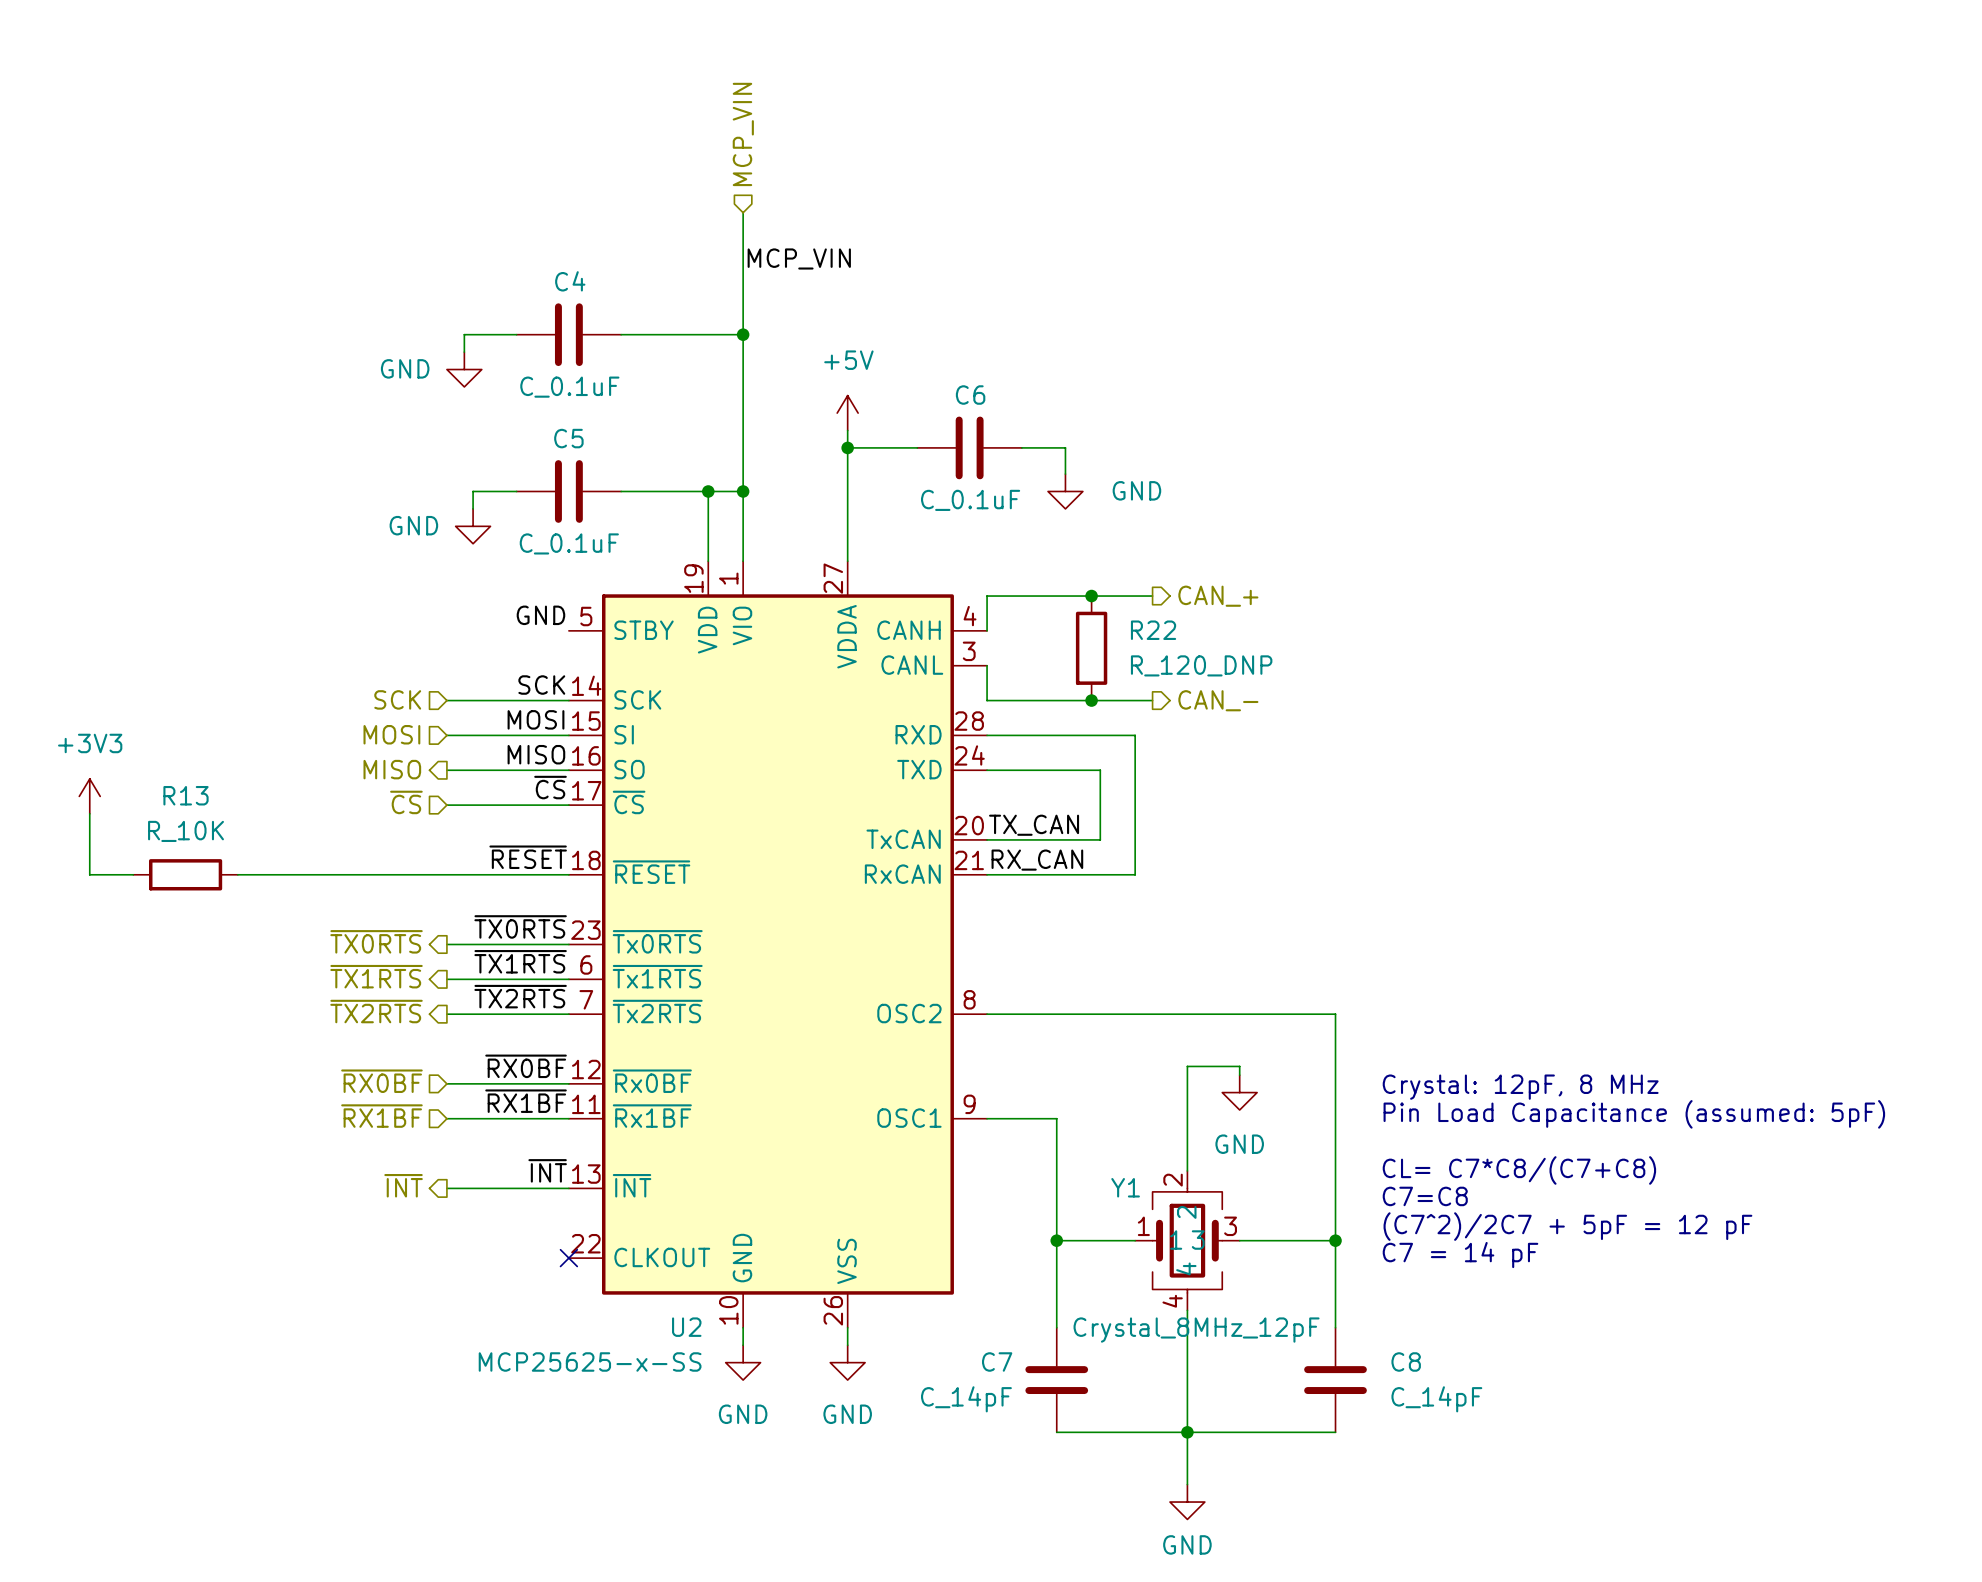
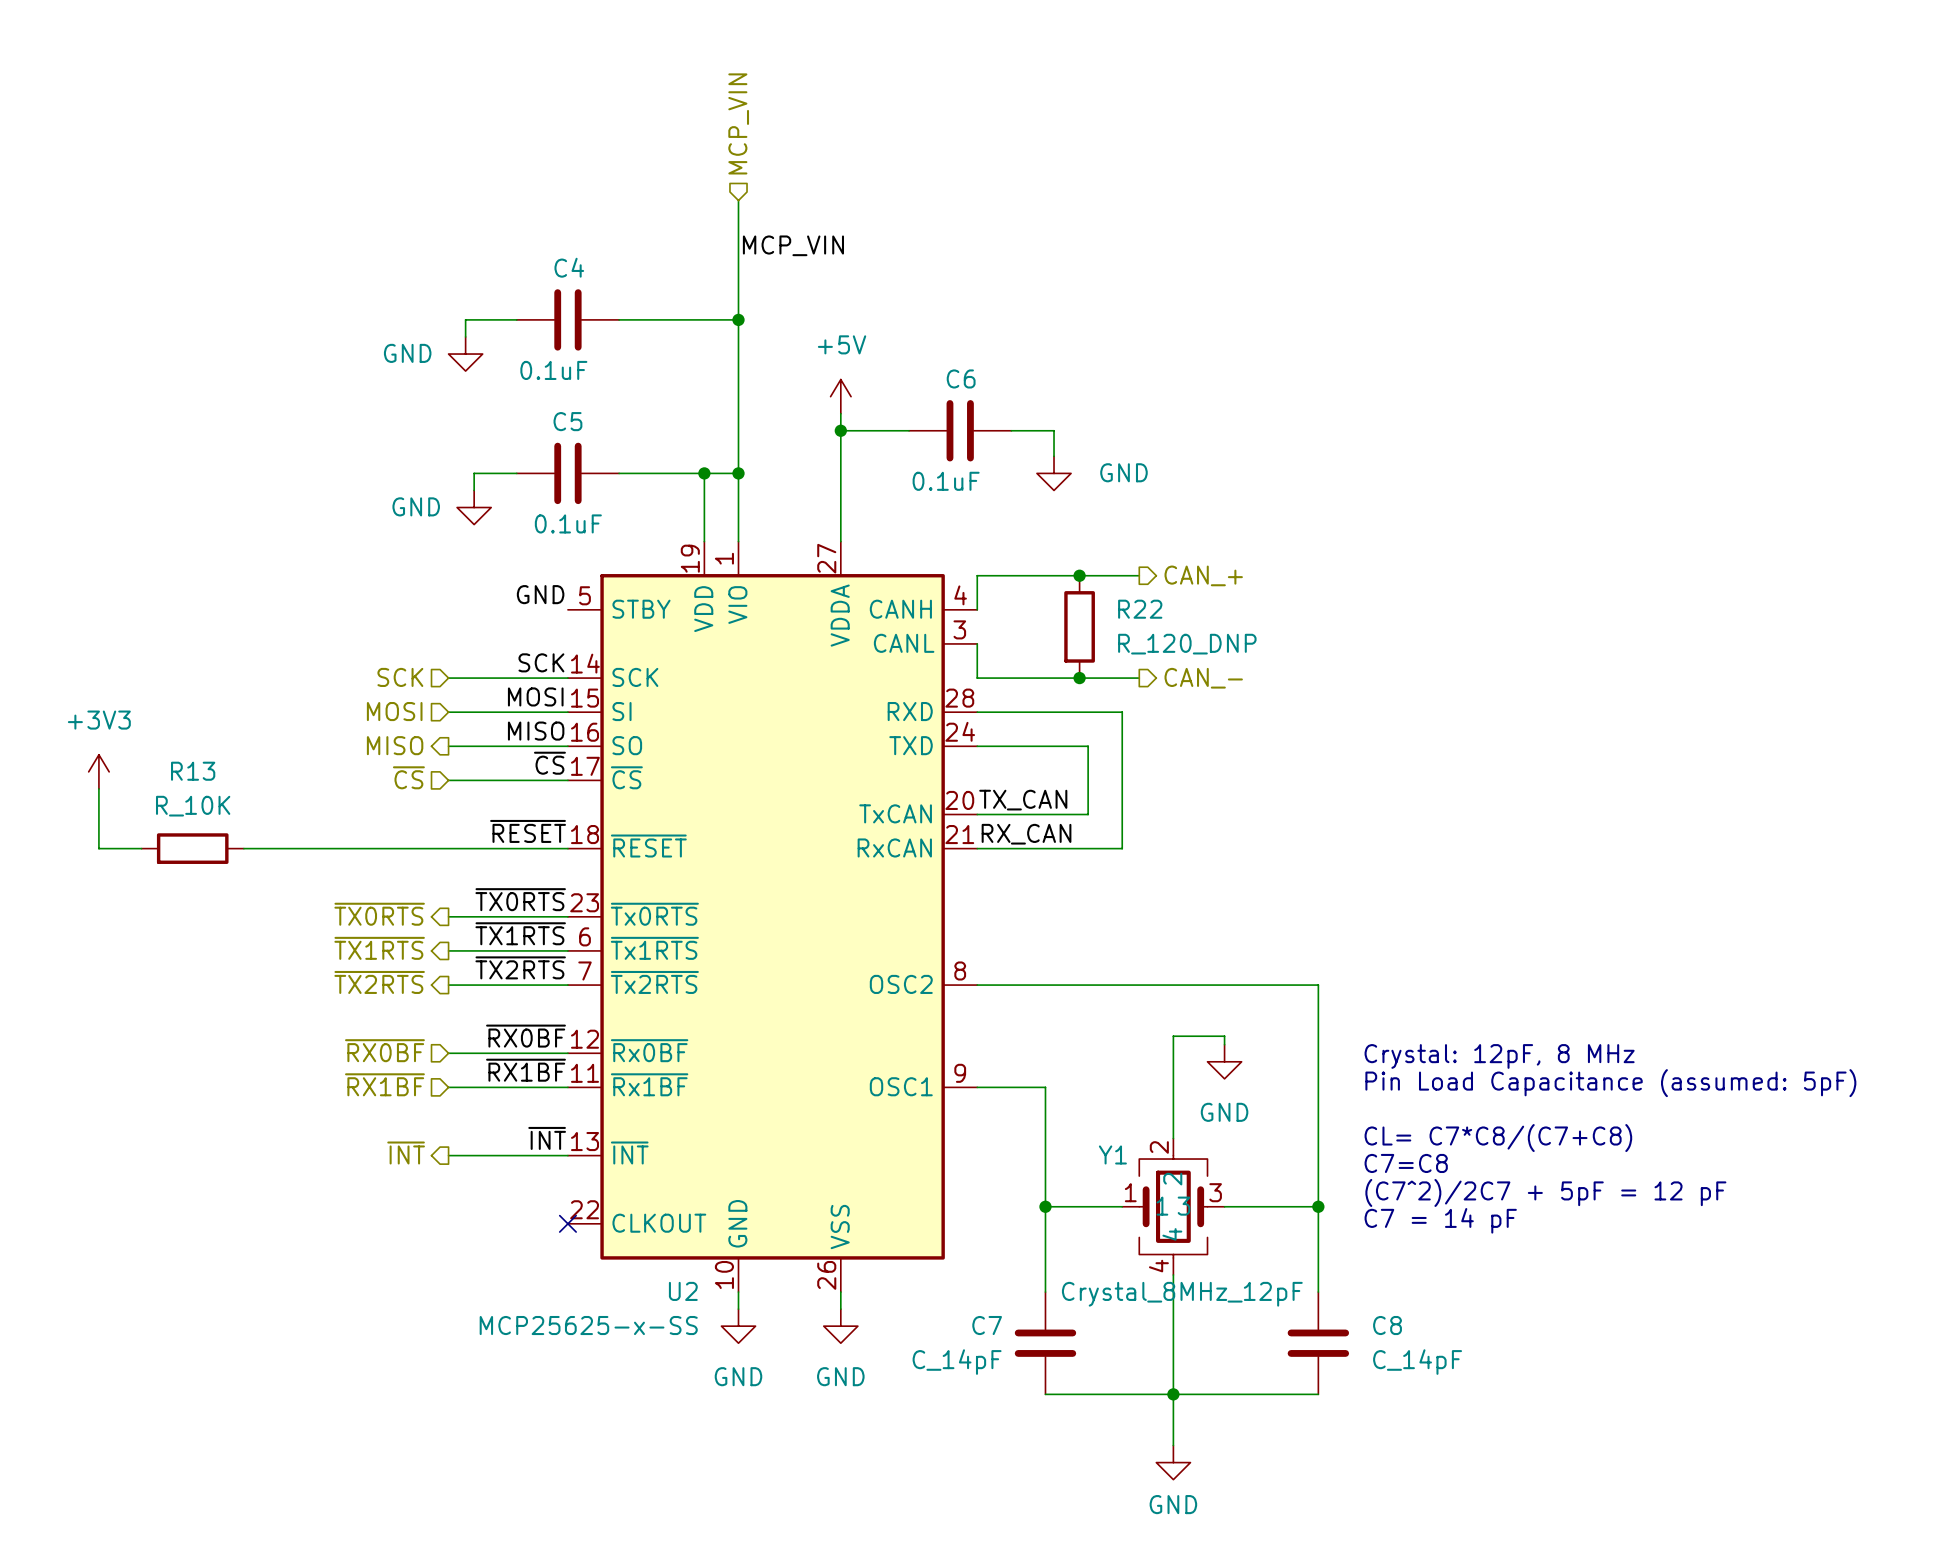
C4 value: C_0.1uF (569, 387) -> 0.1uF (553, 370)
C6 value: C_0.1uF (970, 500) -> 0.1uF (946, 481)
C5 value: C_0.1uF (569, 543) -> 0.1uF (568, 523)

